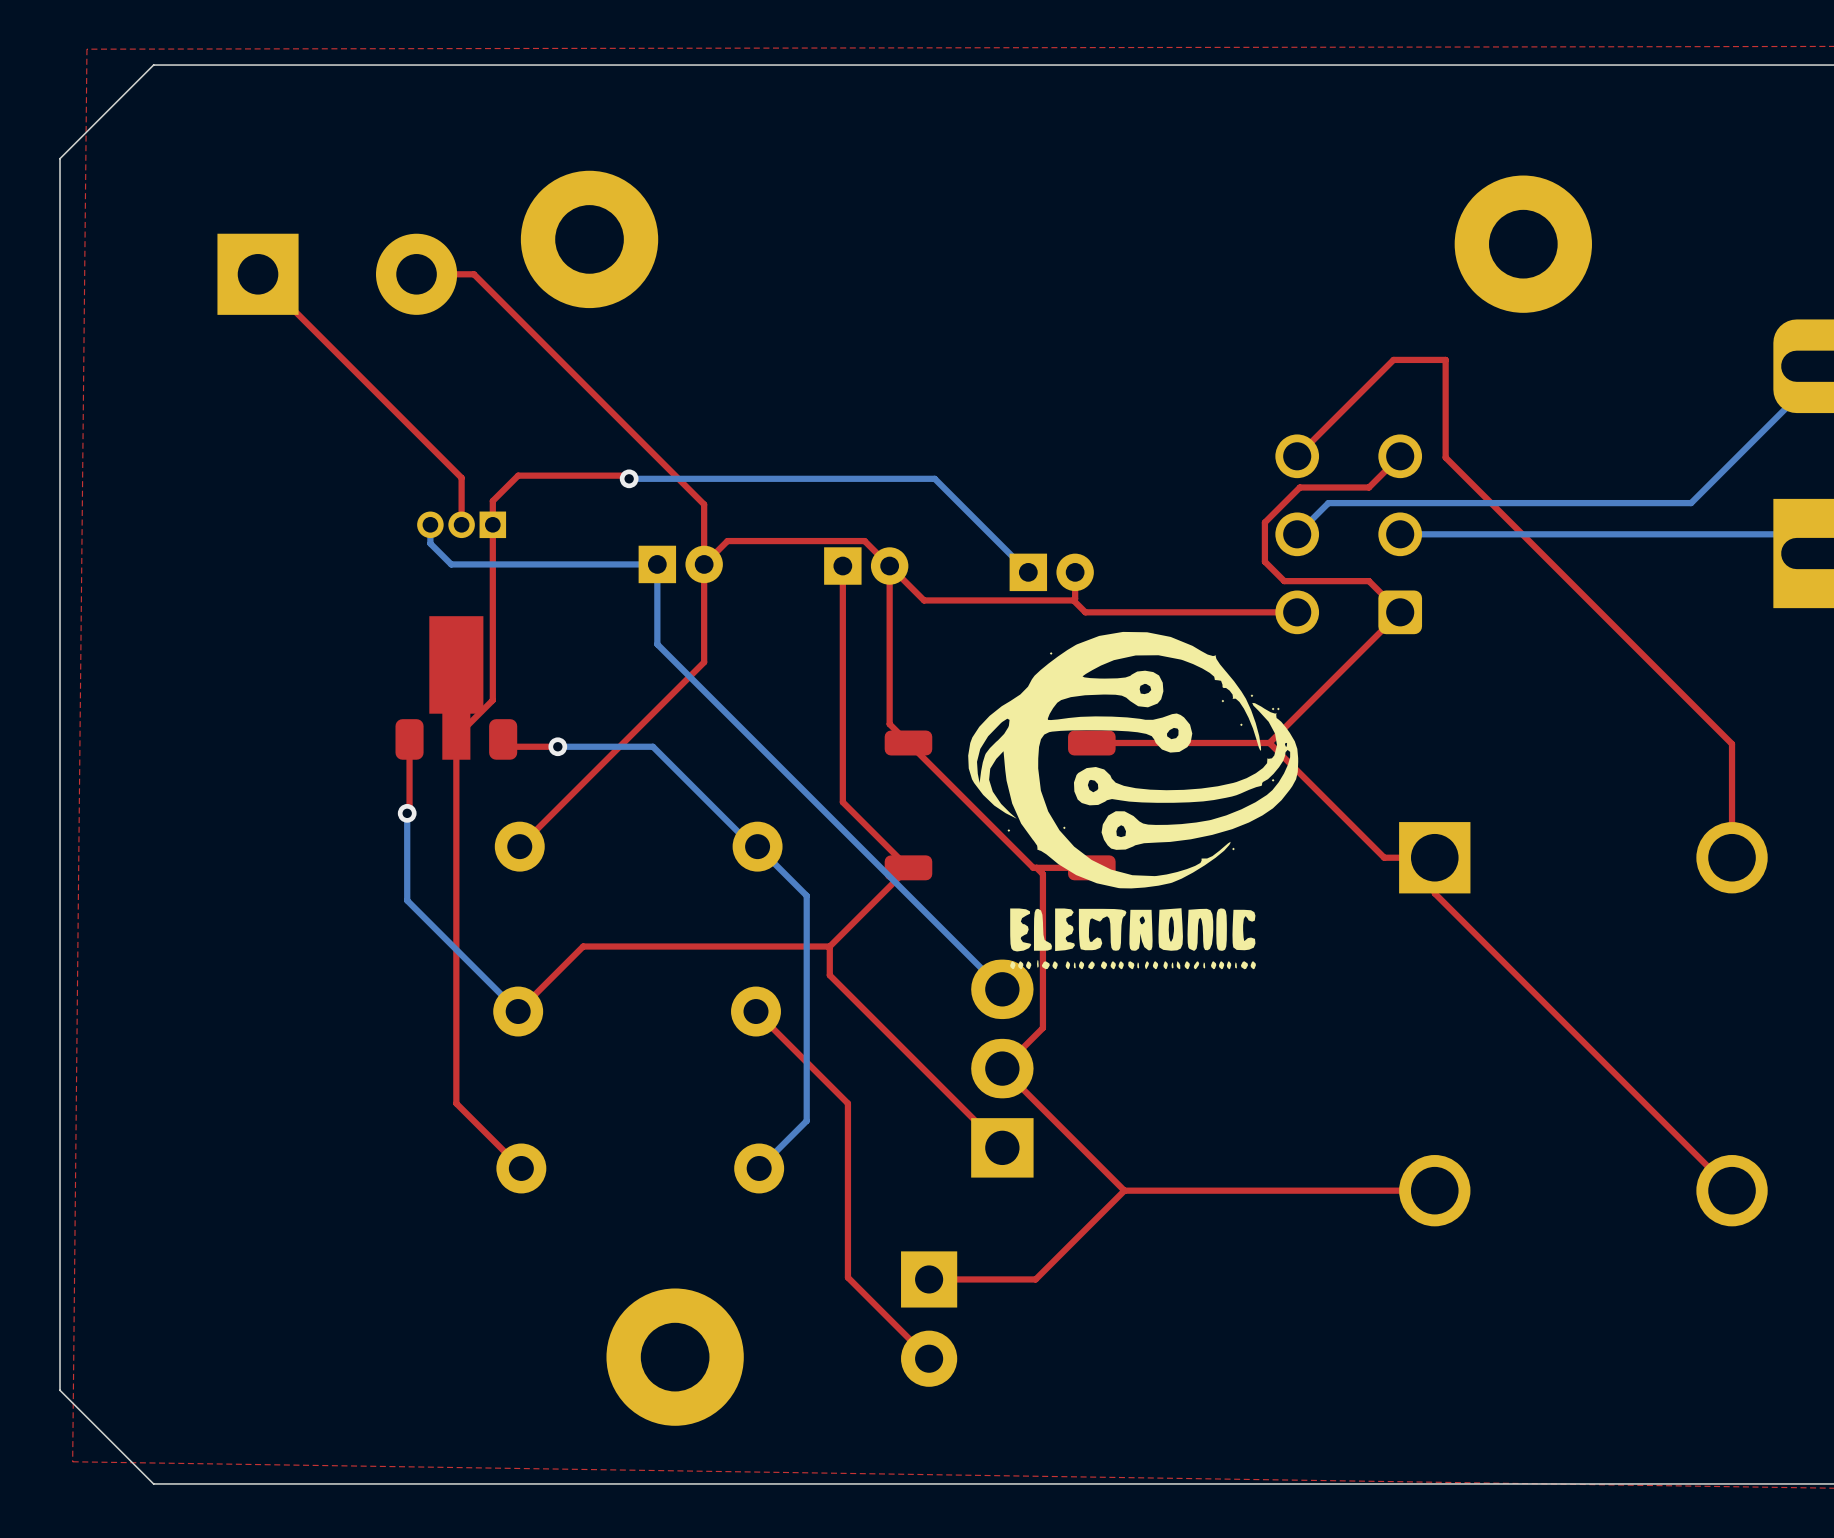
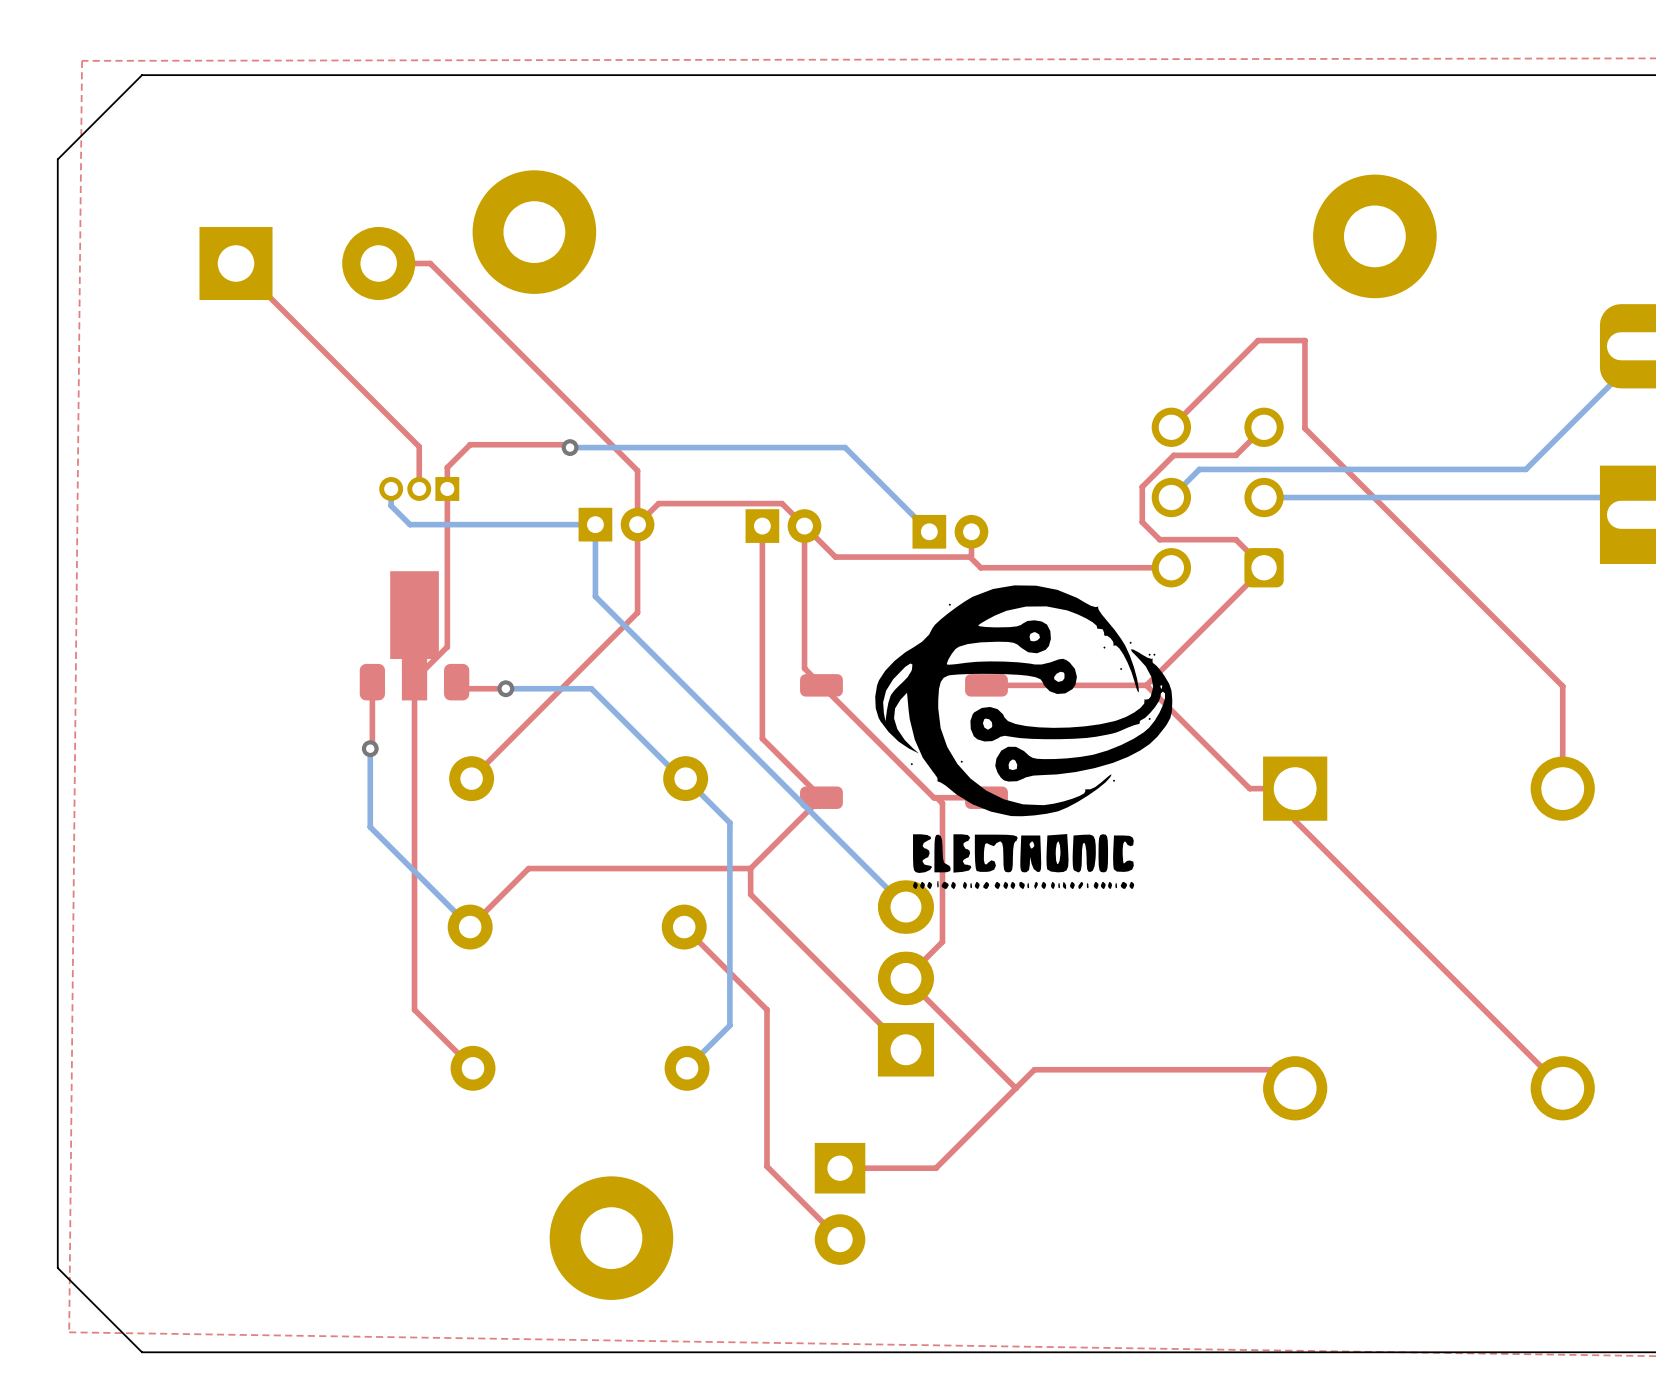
top track: (1434, 1190) (1124, 1190) -> (1295, 1088) (1276, 1069) (1034, 1069) (1015, 1088)

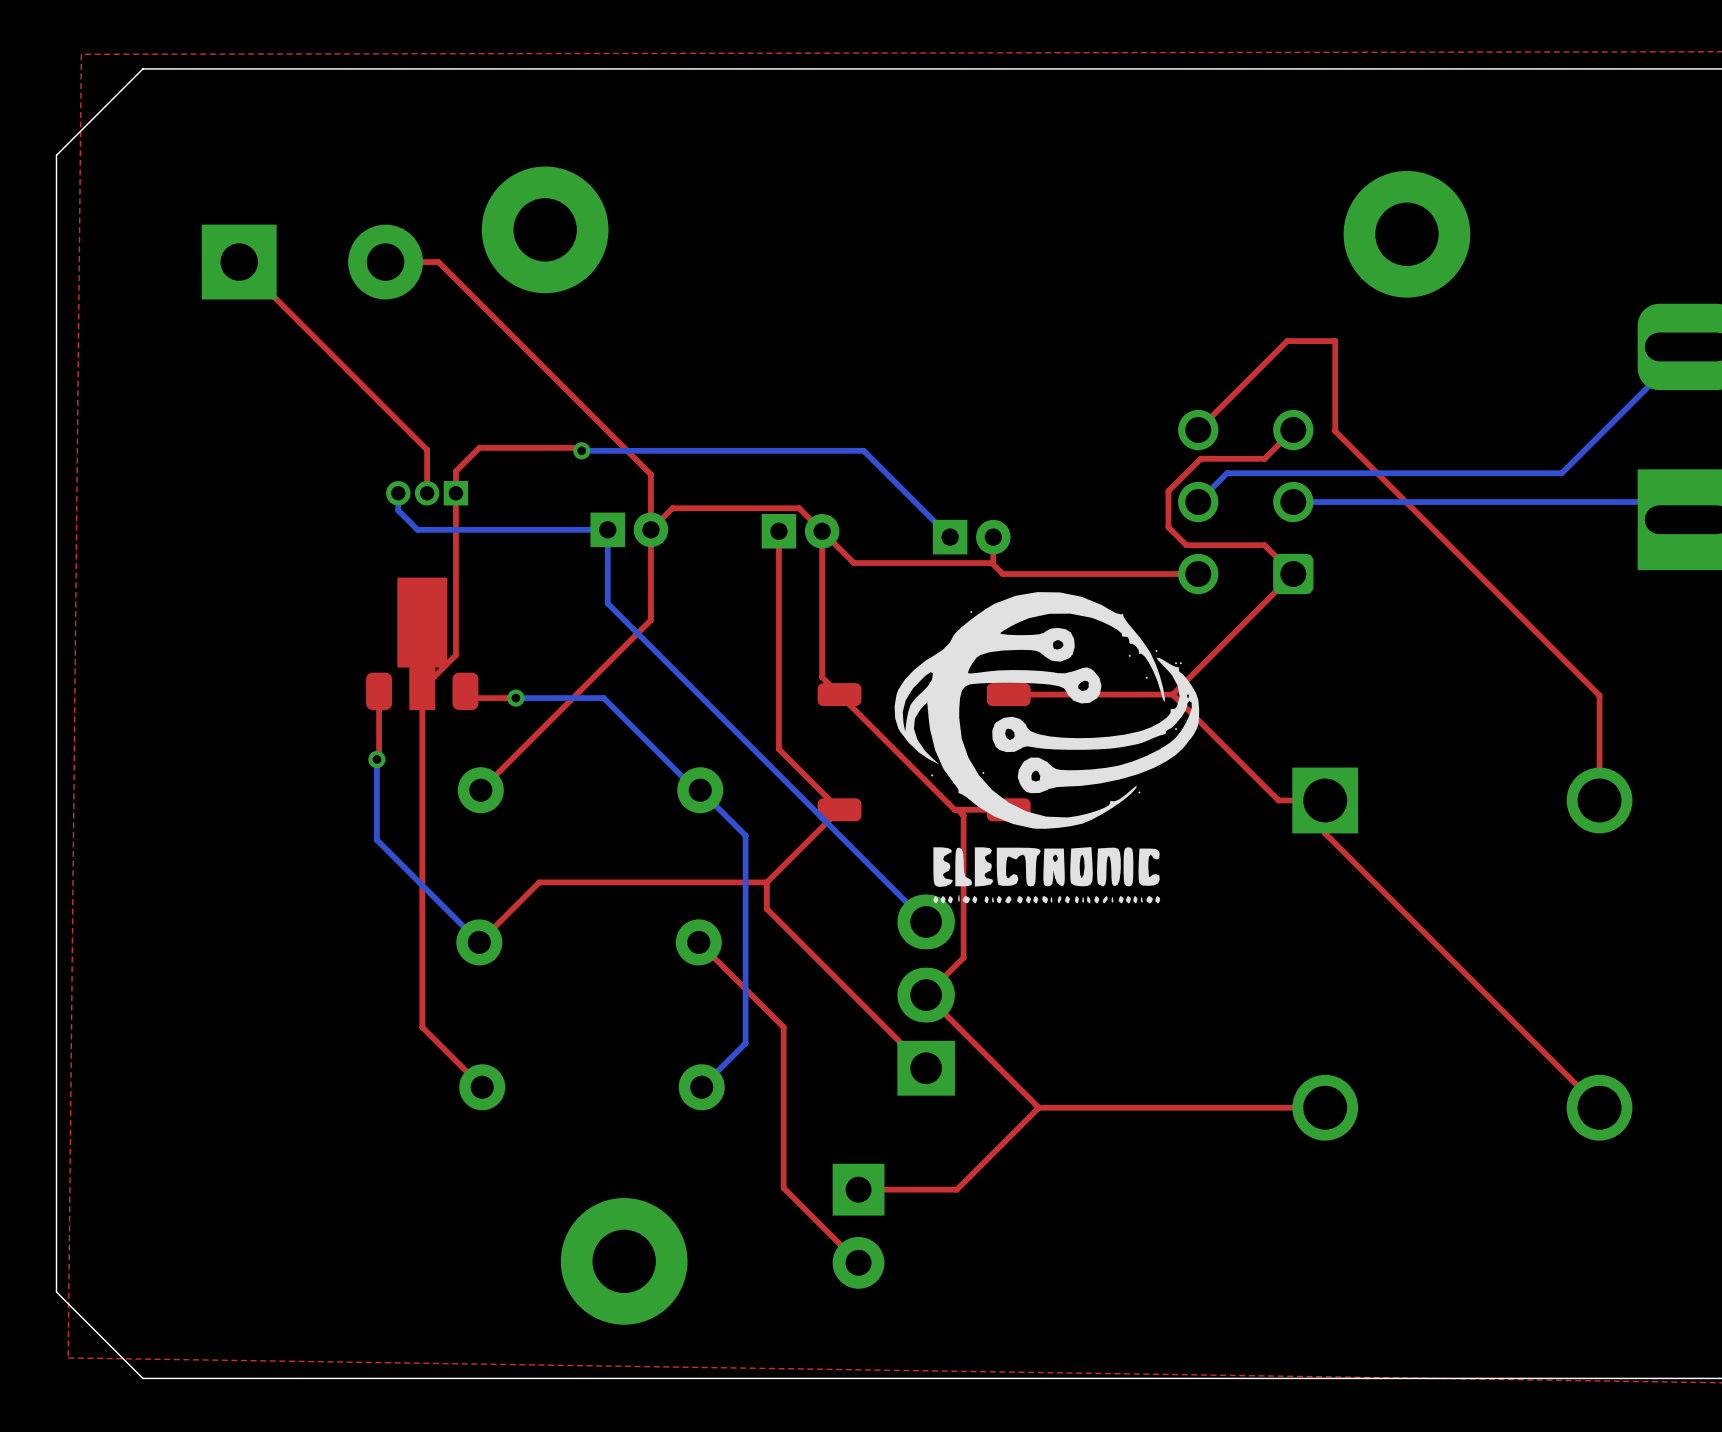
top track: (1295, 1088) (1276, 1069) (1034, 1069) (1015, 1088) -> (1325, 1107) (1038, 1107)

